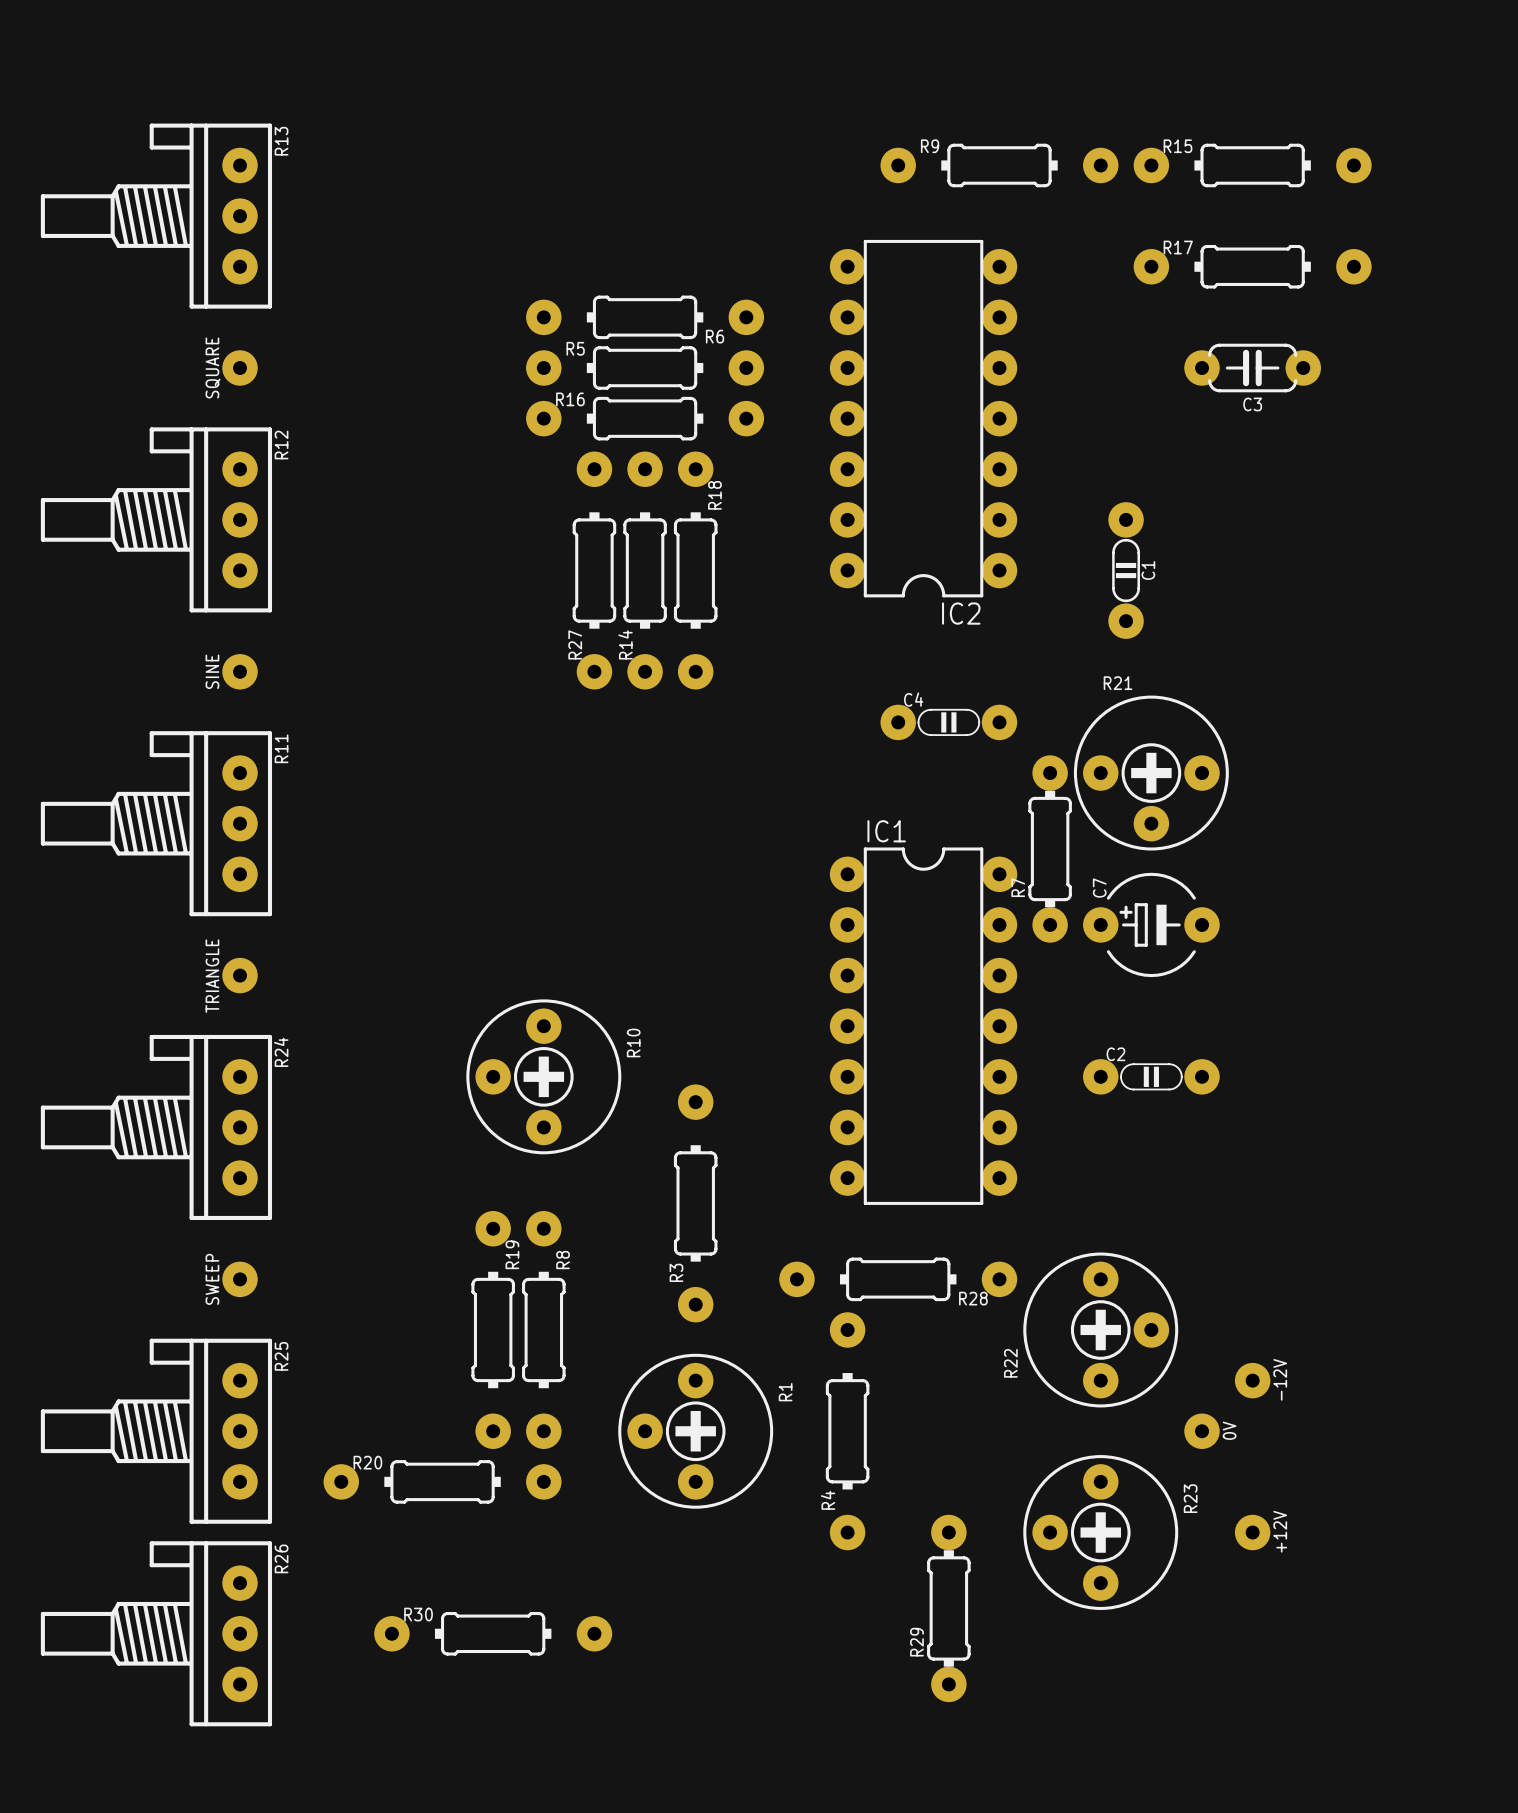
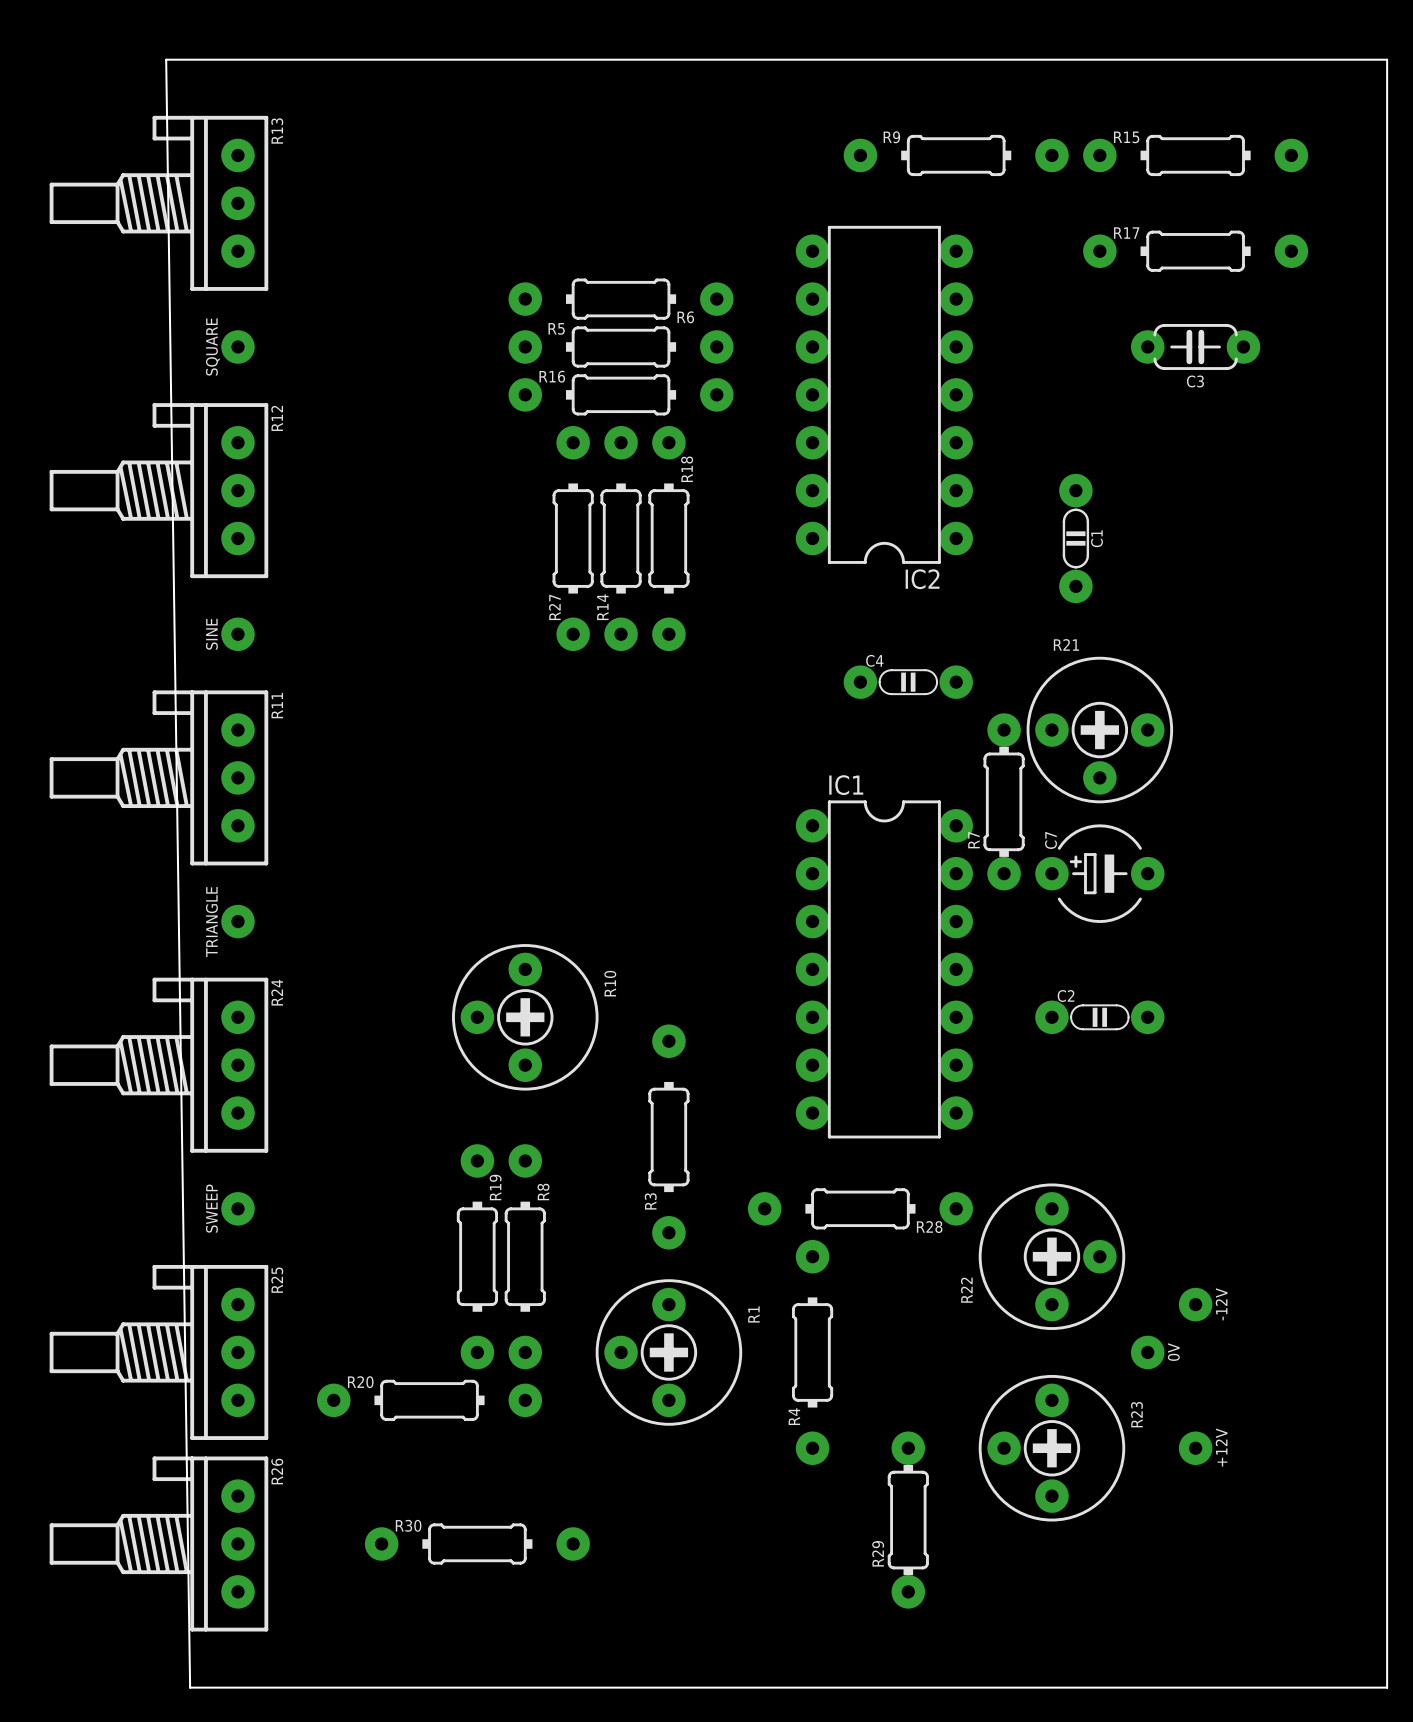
board edge: none -> (166, 59) (1387, 59) (1387, 1687) (190, 1687) (166, 59)

